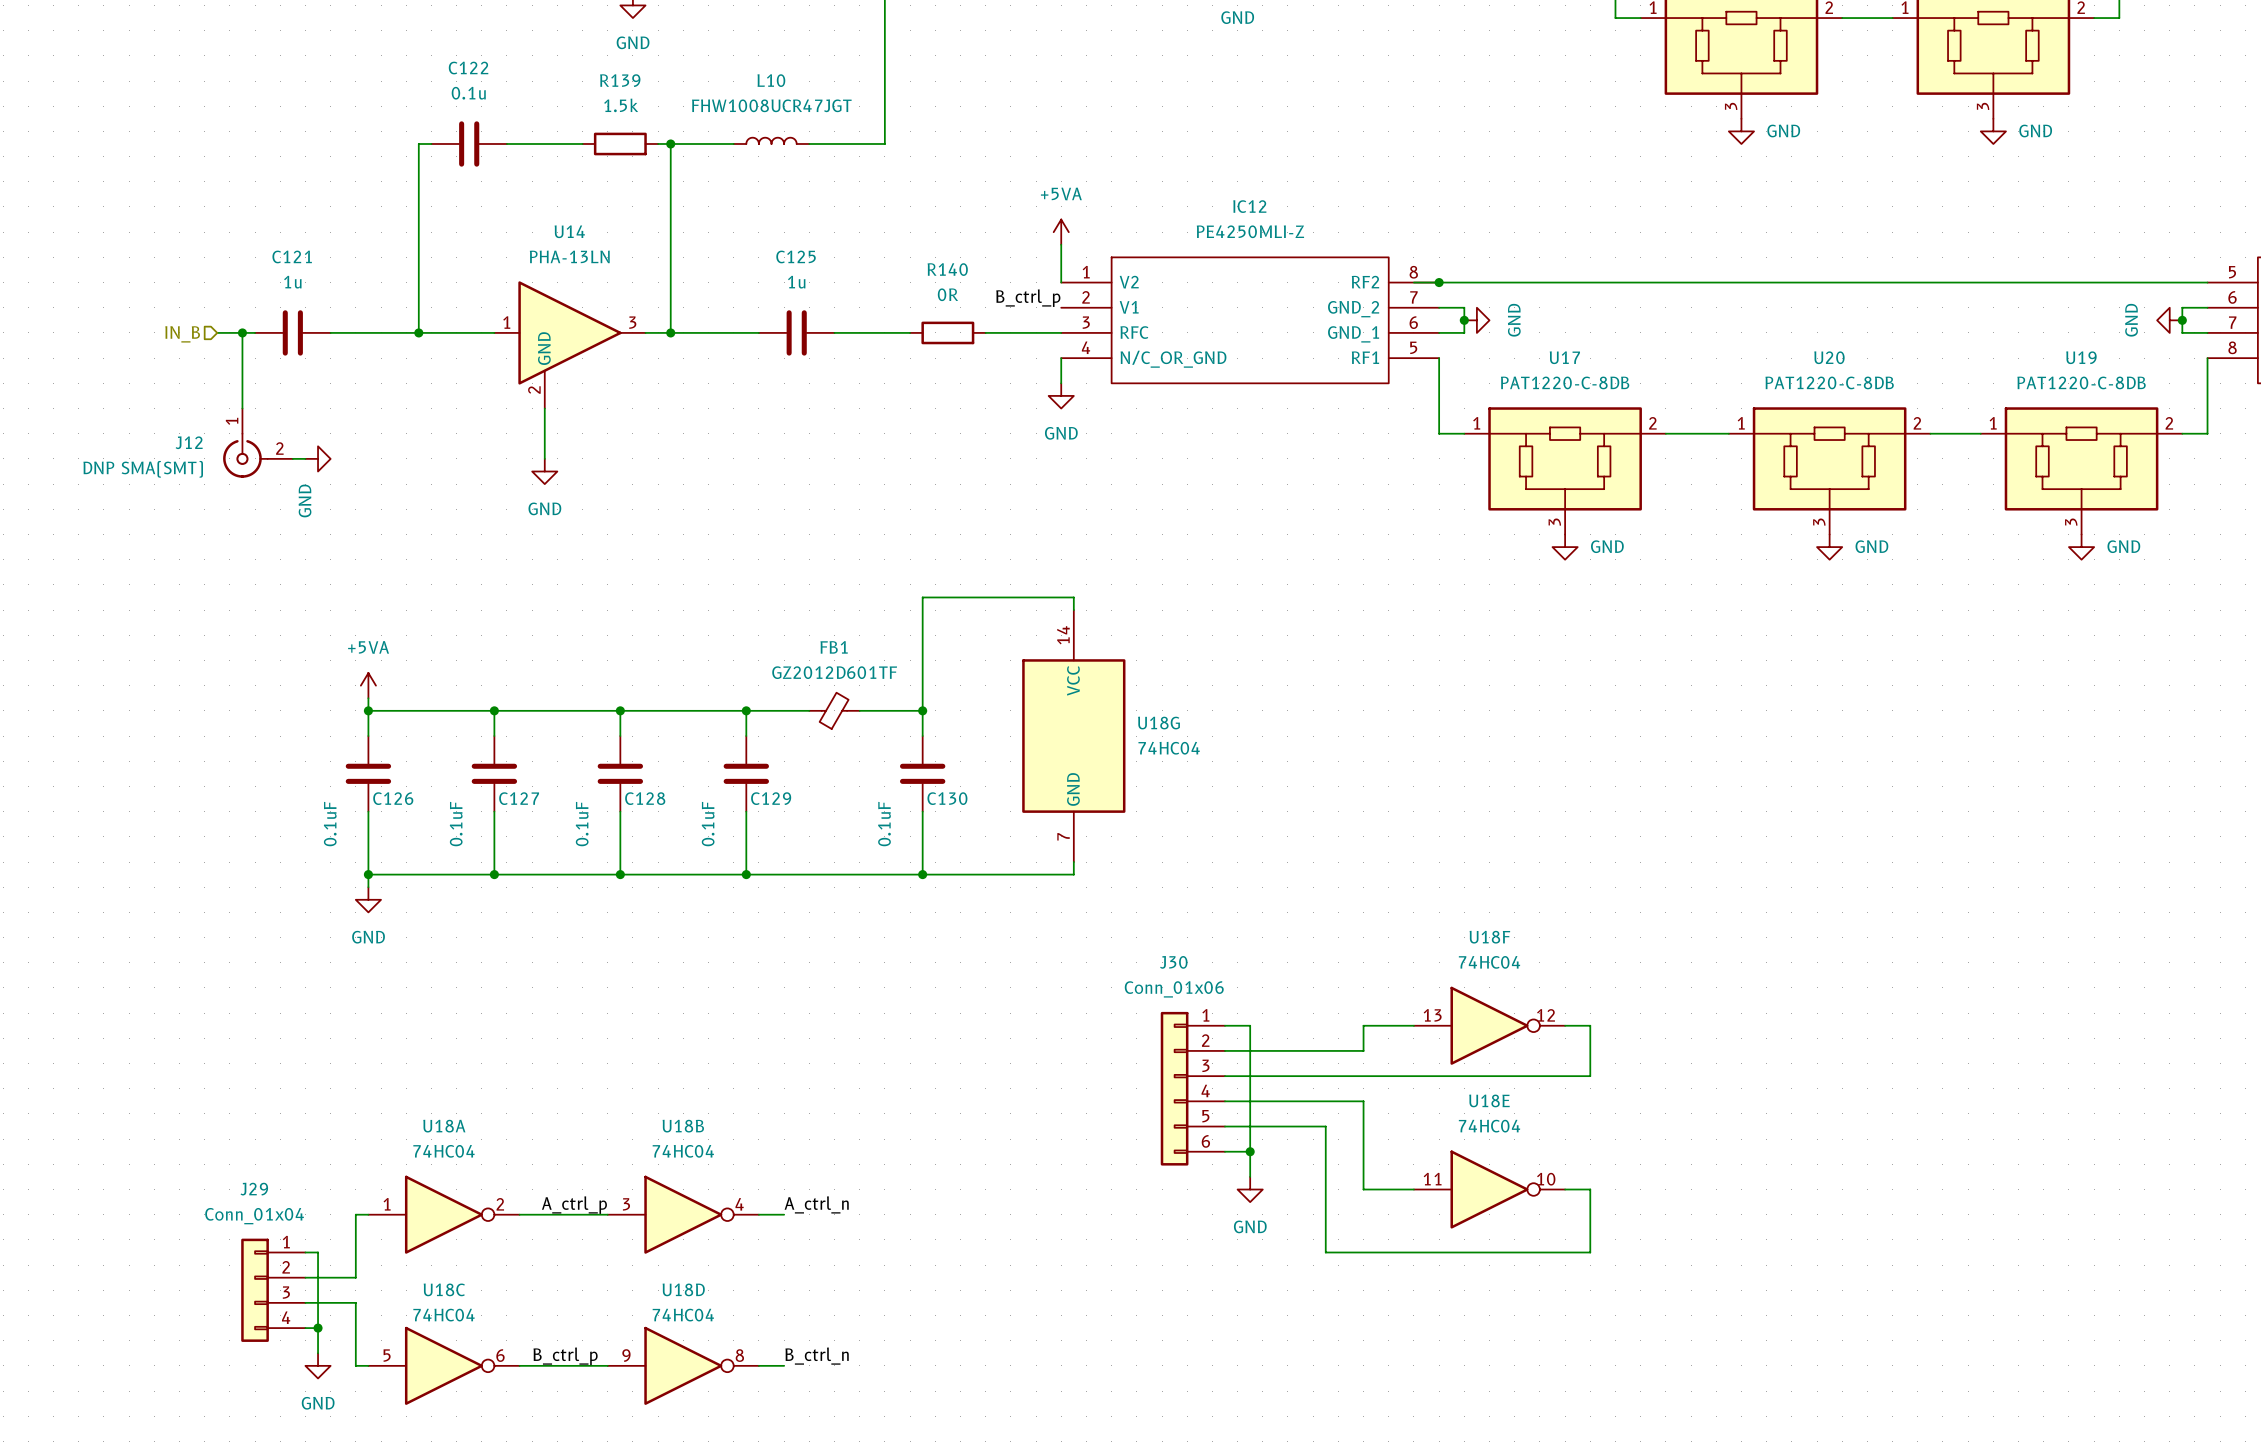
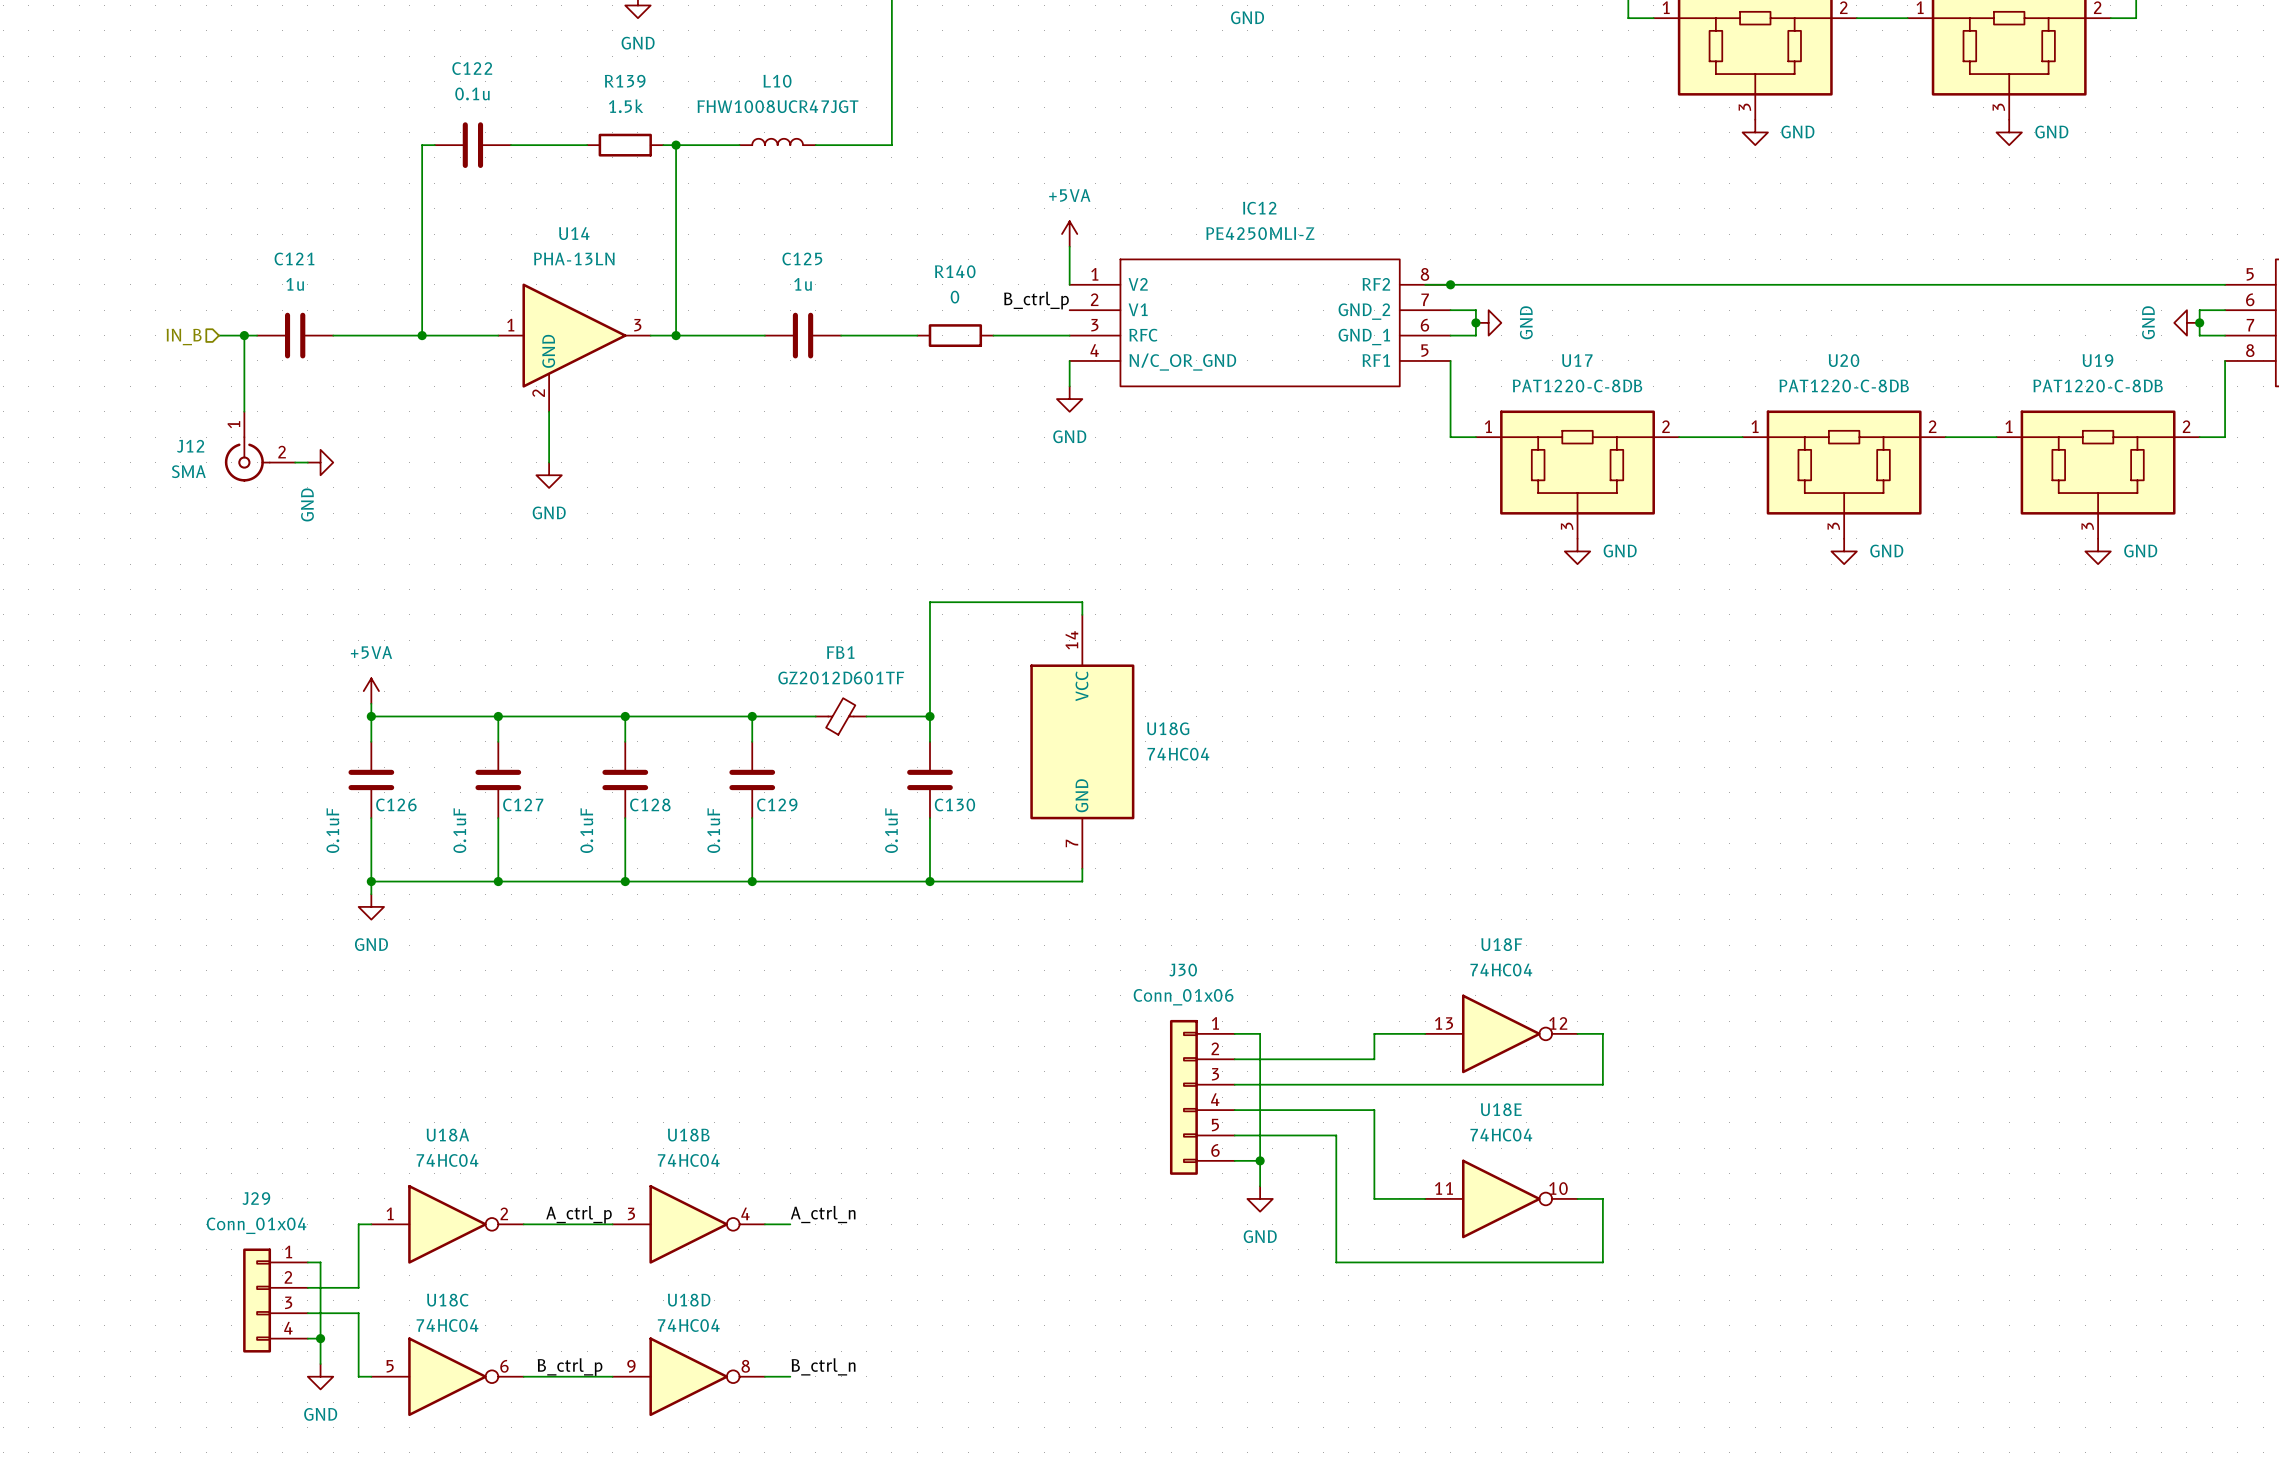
R140 value: 0R (947, 294) -> 0 (954, 297)
J12 value: DNP SMA(SMT) (143, 469) -> SMA (188, 471)

